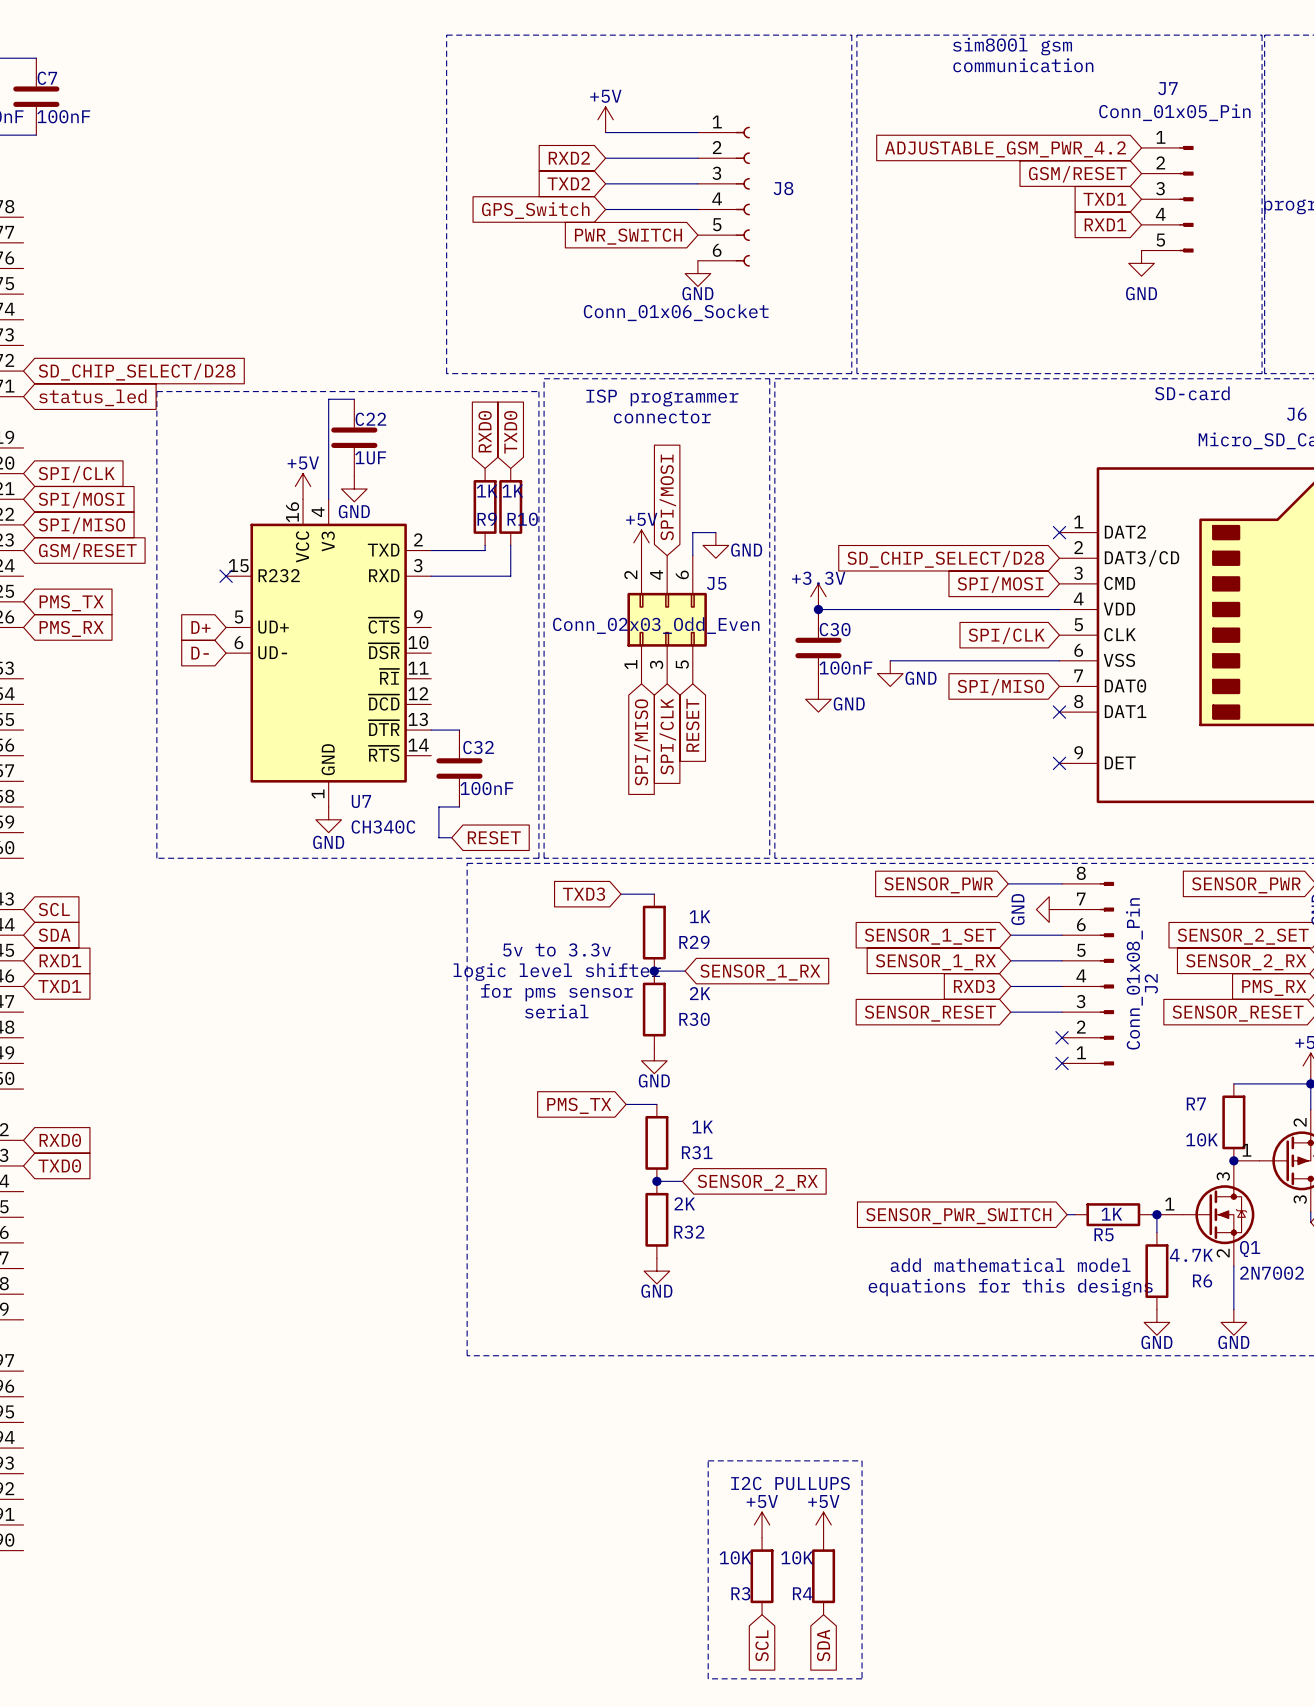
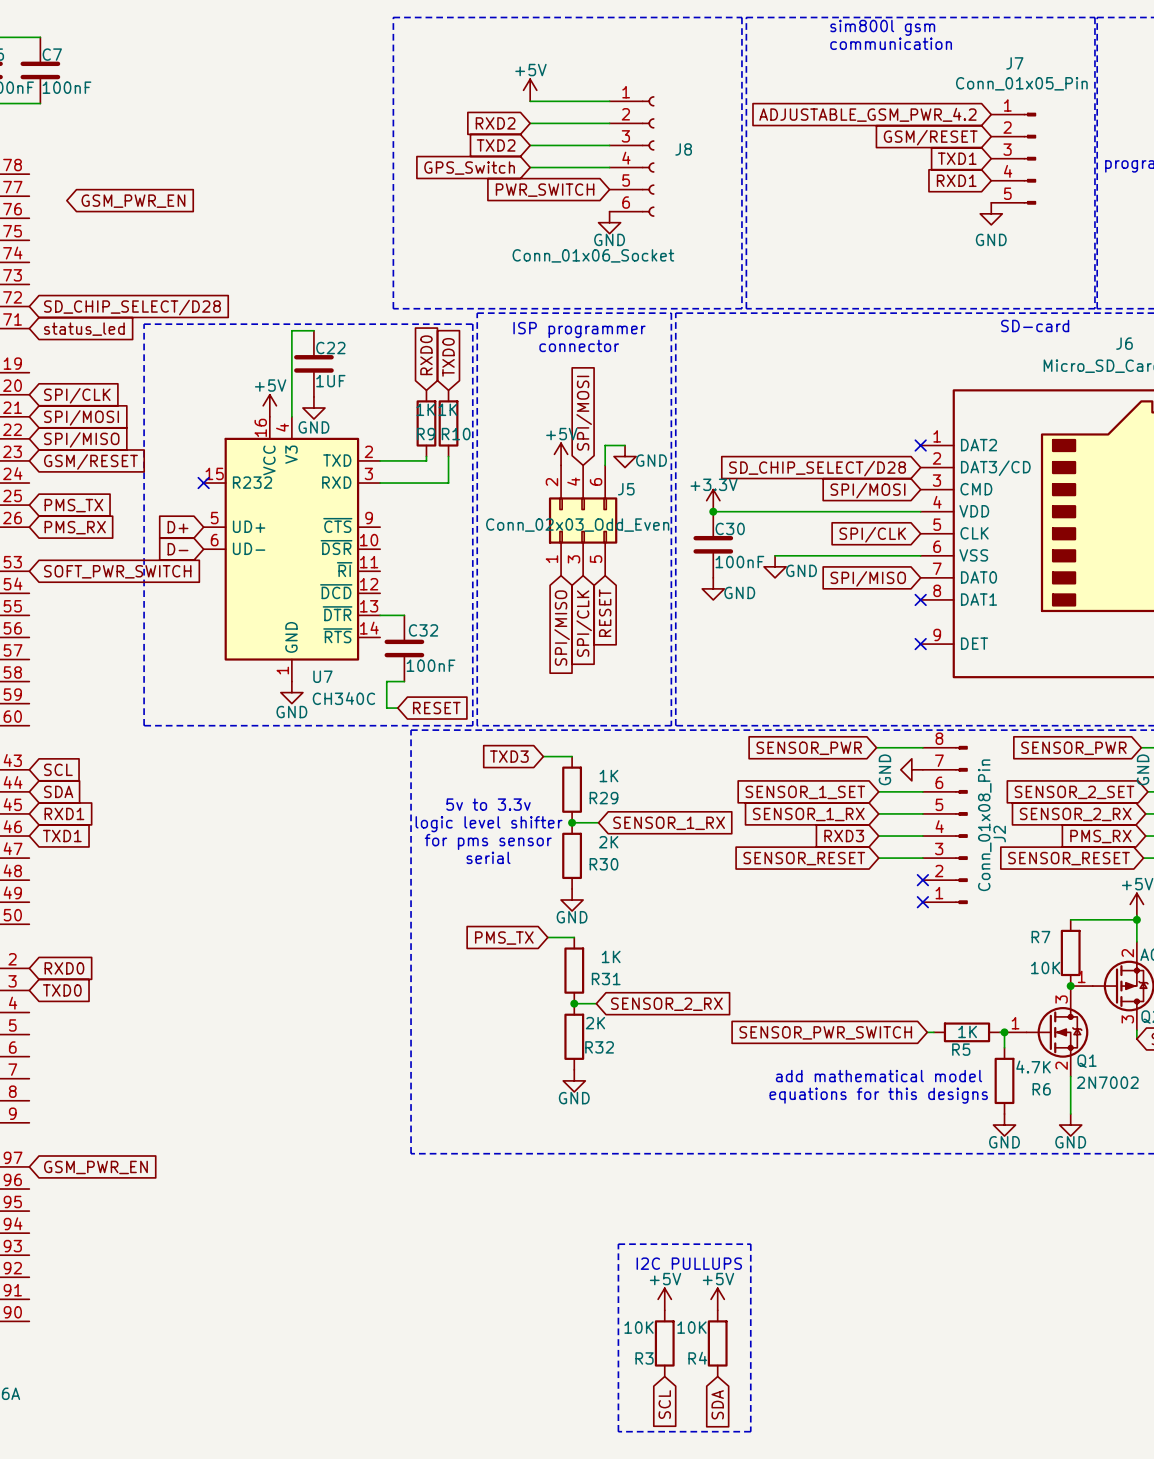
global label: none -> GSM_PWR_EN (133, 201)
global label: none -> SOFT_PWR_SWITCH (117, 571)
global label: none -> GSM_PWR_EN (95, 1167)

